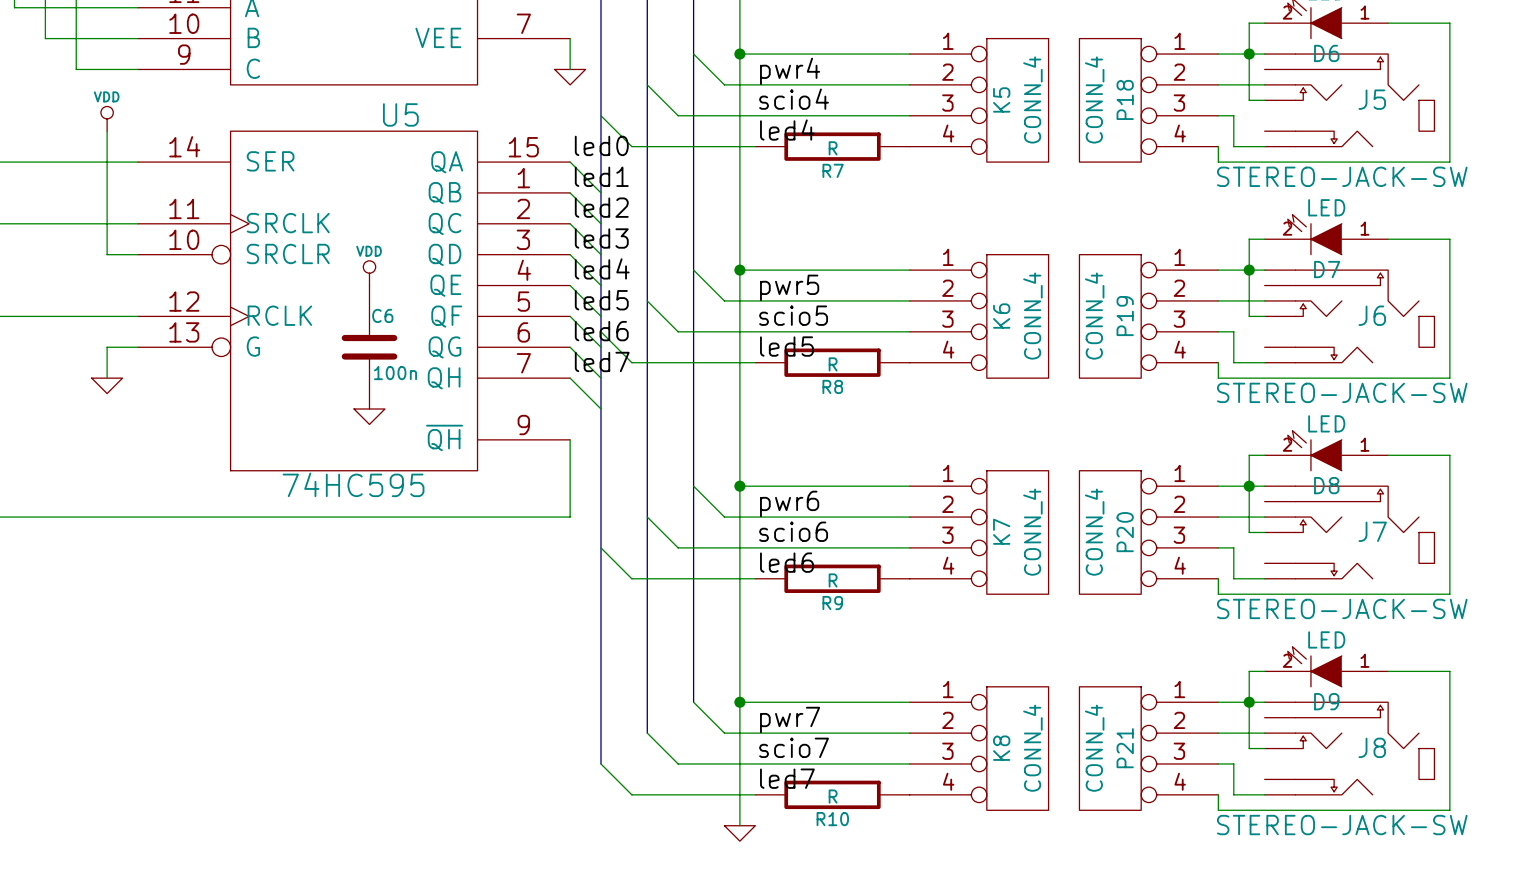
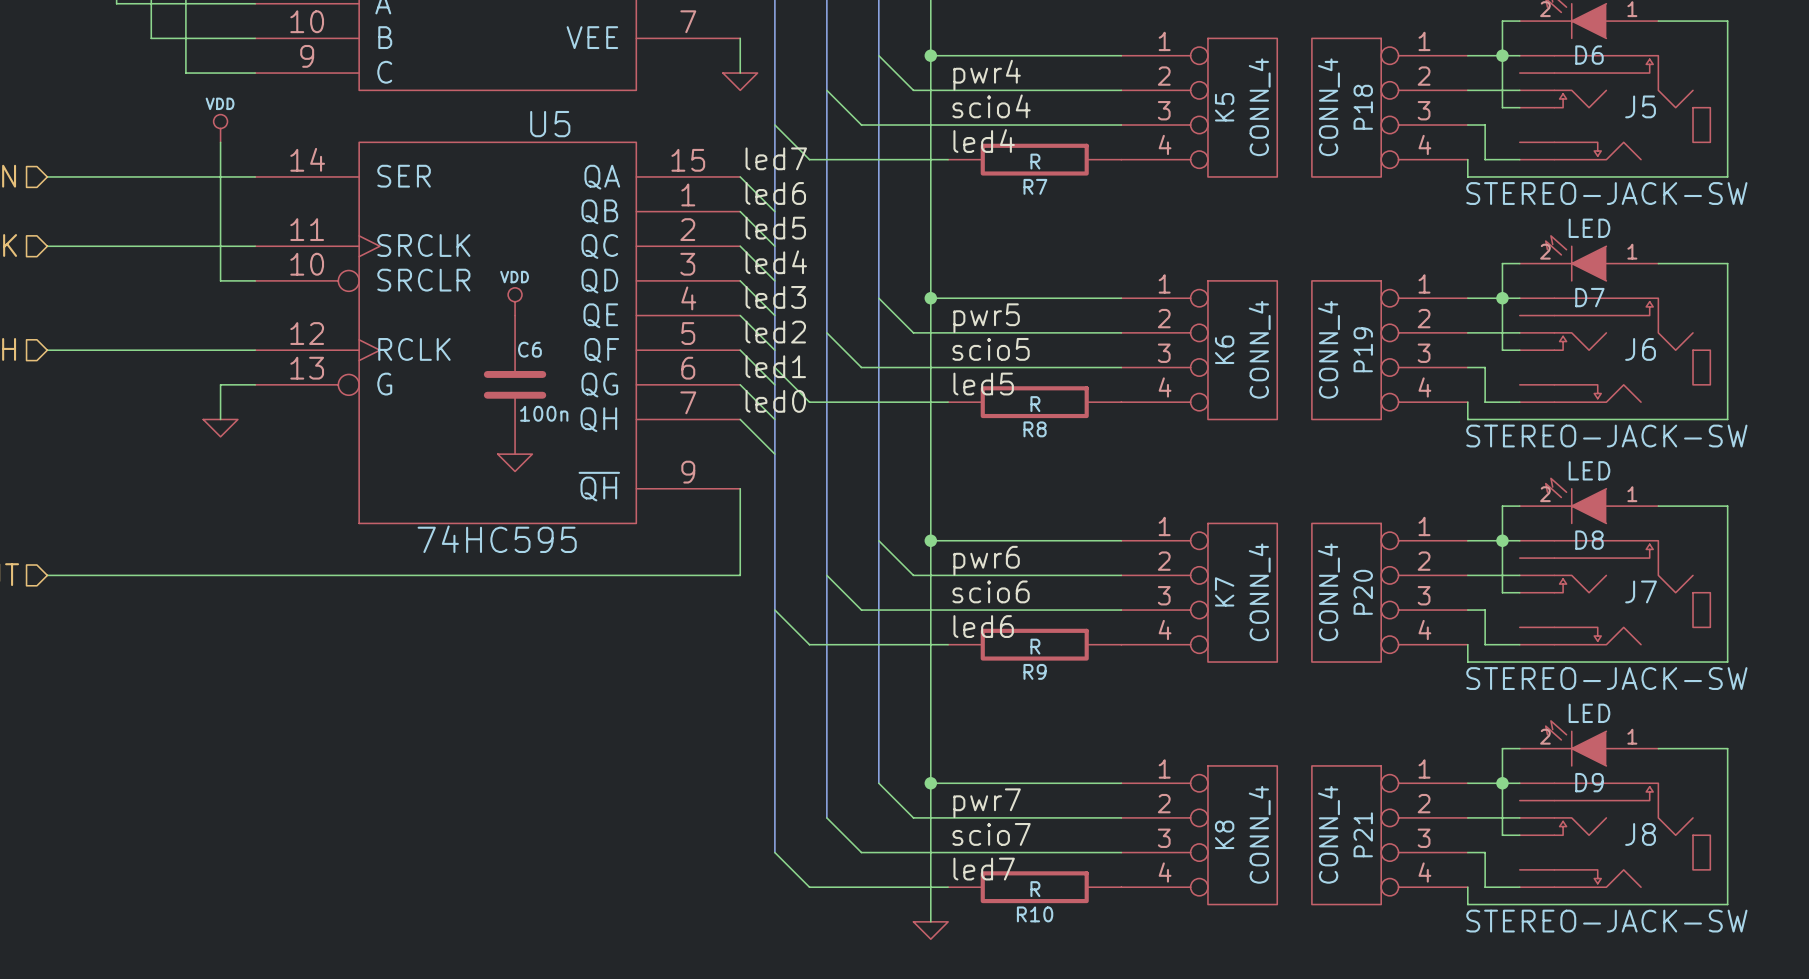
label: led0 (601, 145) -> led7 (776, 158)
label: led1 (601, 176) -> led6 (775, 193)
label: led2 (601, 207) -> led5 (775, 228)
label: led3 (601, 238) -> led4 (776, 262)
label: led4 (602, 268) -> led3 (775, 297)
label: led5 (601, 300) -> led2 (775, 332)
label: led6 (601, 331) -> led1 (775, 366)
label: led7 (602, 361) -> led0 (775, 401)

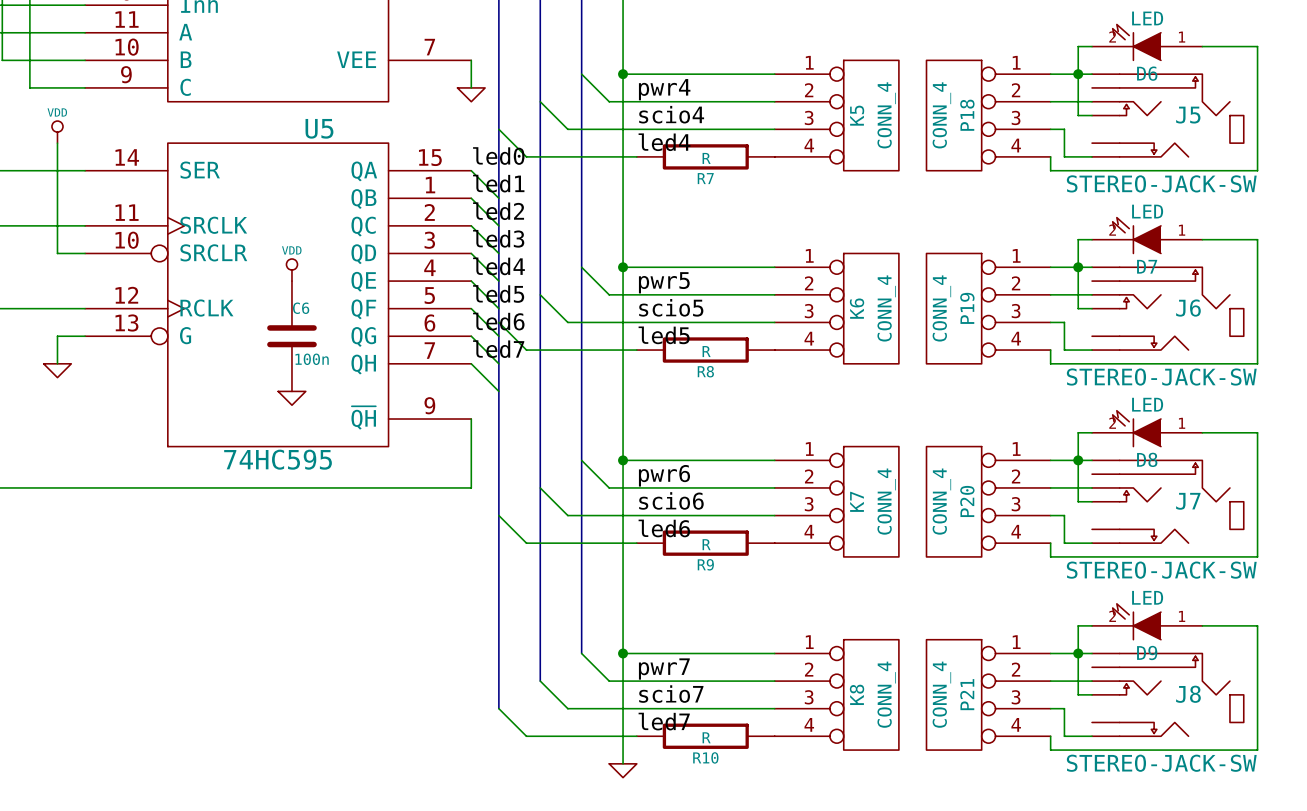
label: led7 (776, 158) -> led0 (498, 156)
label: led6 (775, 193) -> led1 (498, 183)
label: led5 (775, 228) -> led2 (498, 211)
label: led4 (776, 262) -> led3 (498, 238)
label: led3 (775, 297) -> led4 (498, 266)
label: led2 (775, 332) -> led5 (498, 293)
label: led1 (775, 366) -> led6 (498, 321)
label: led0 (775, 401) -> led7 (498, 349)

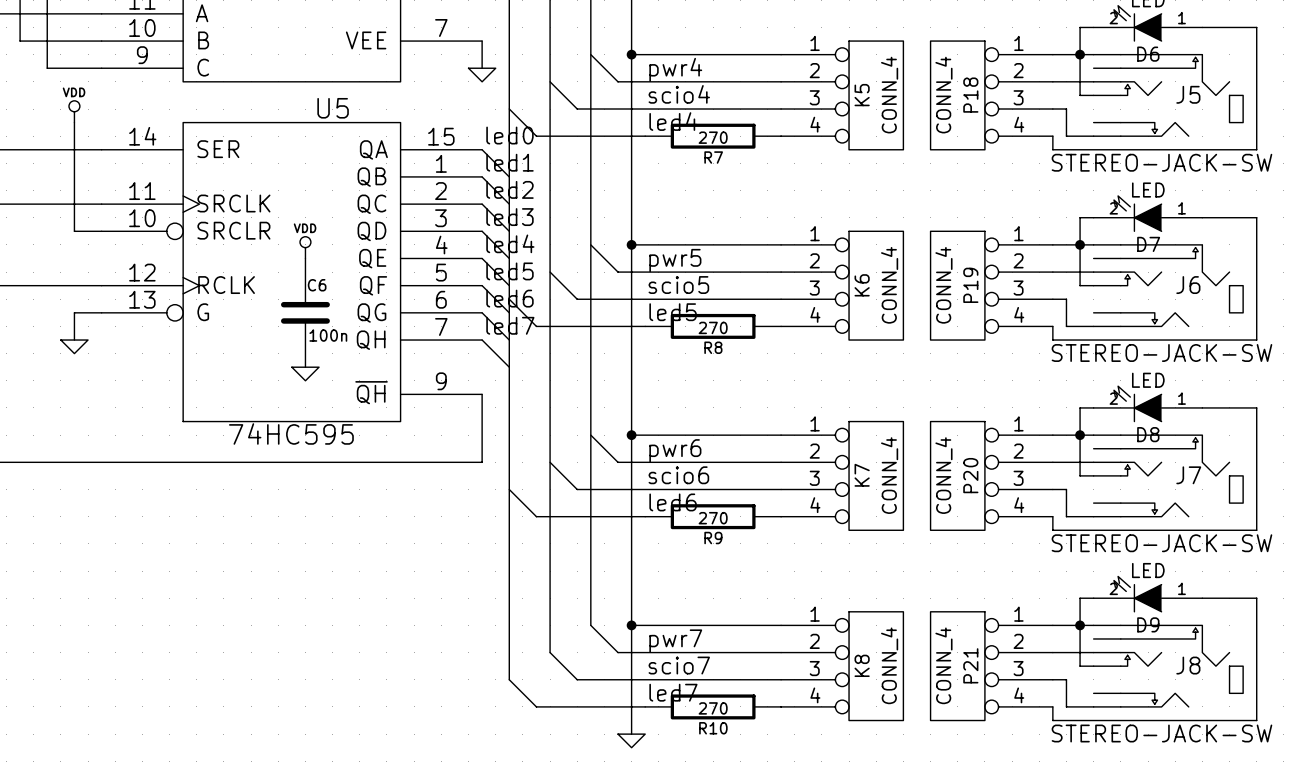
R7 value: R (706, 158) -> 270 (713, 137)
R8 value: R (706, 351) -> 270 (713, 327)
R9 value: R (706, 544) -> 270 (713, 518)
R10 value: R (706, 737) -> 270 (713, 708)

